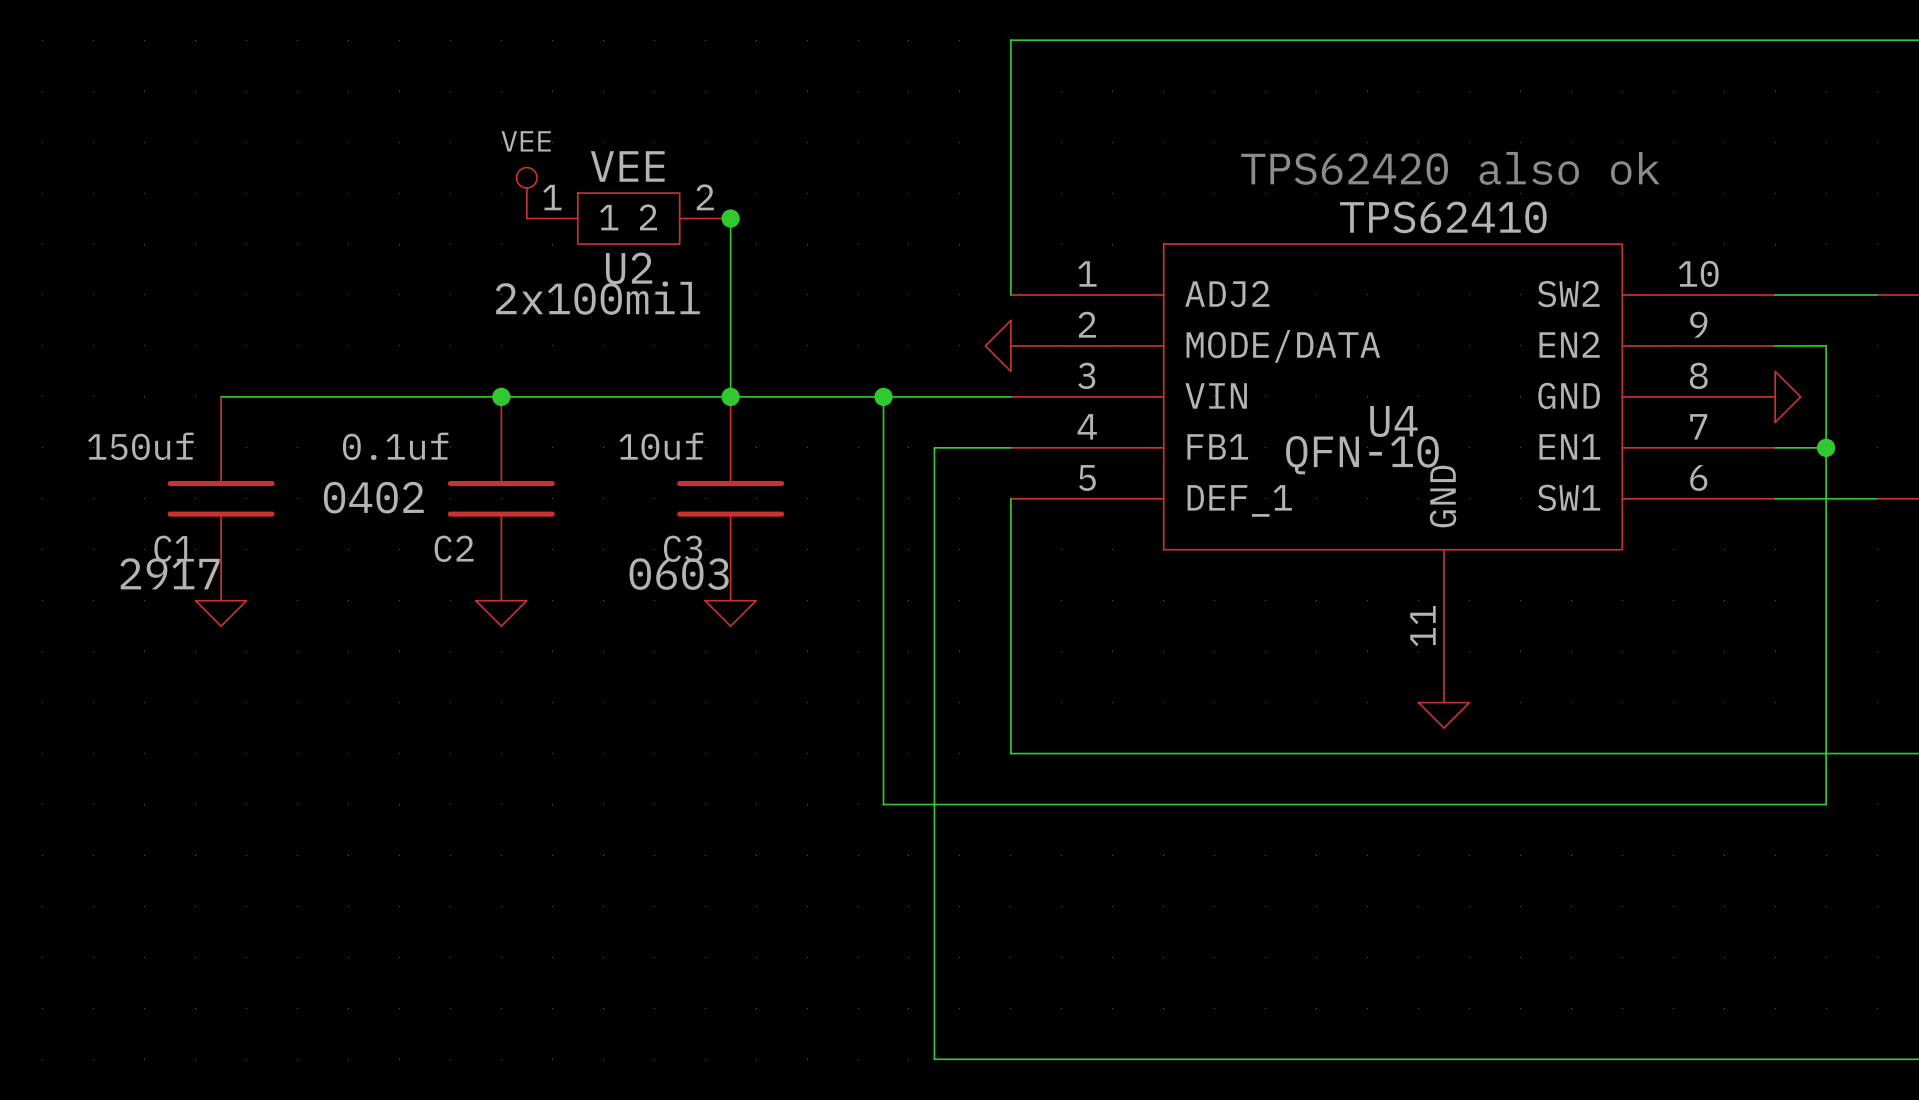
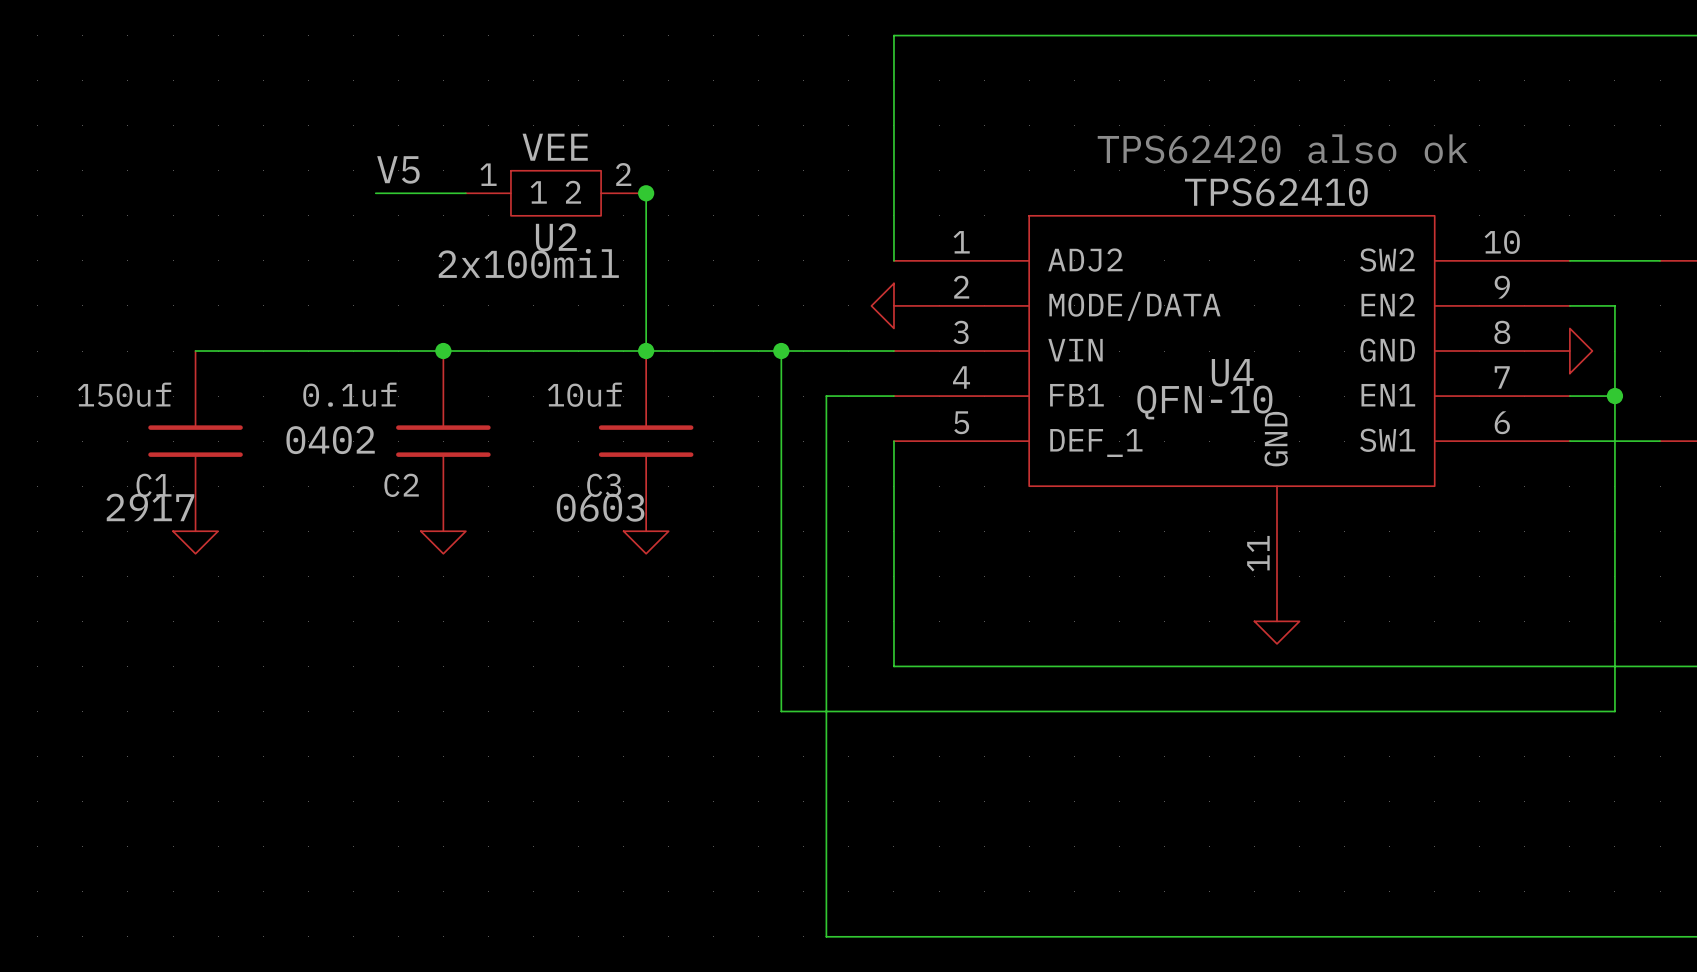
label: none -> V5 (398, 169)
power symbol: VEE (526, 193) -> none
wire: none -> (375, 193) (465, 193)

